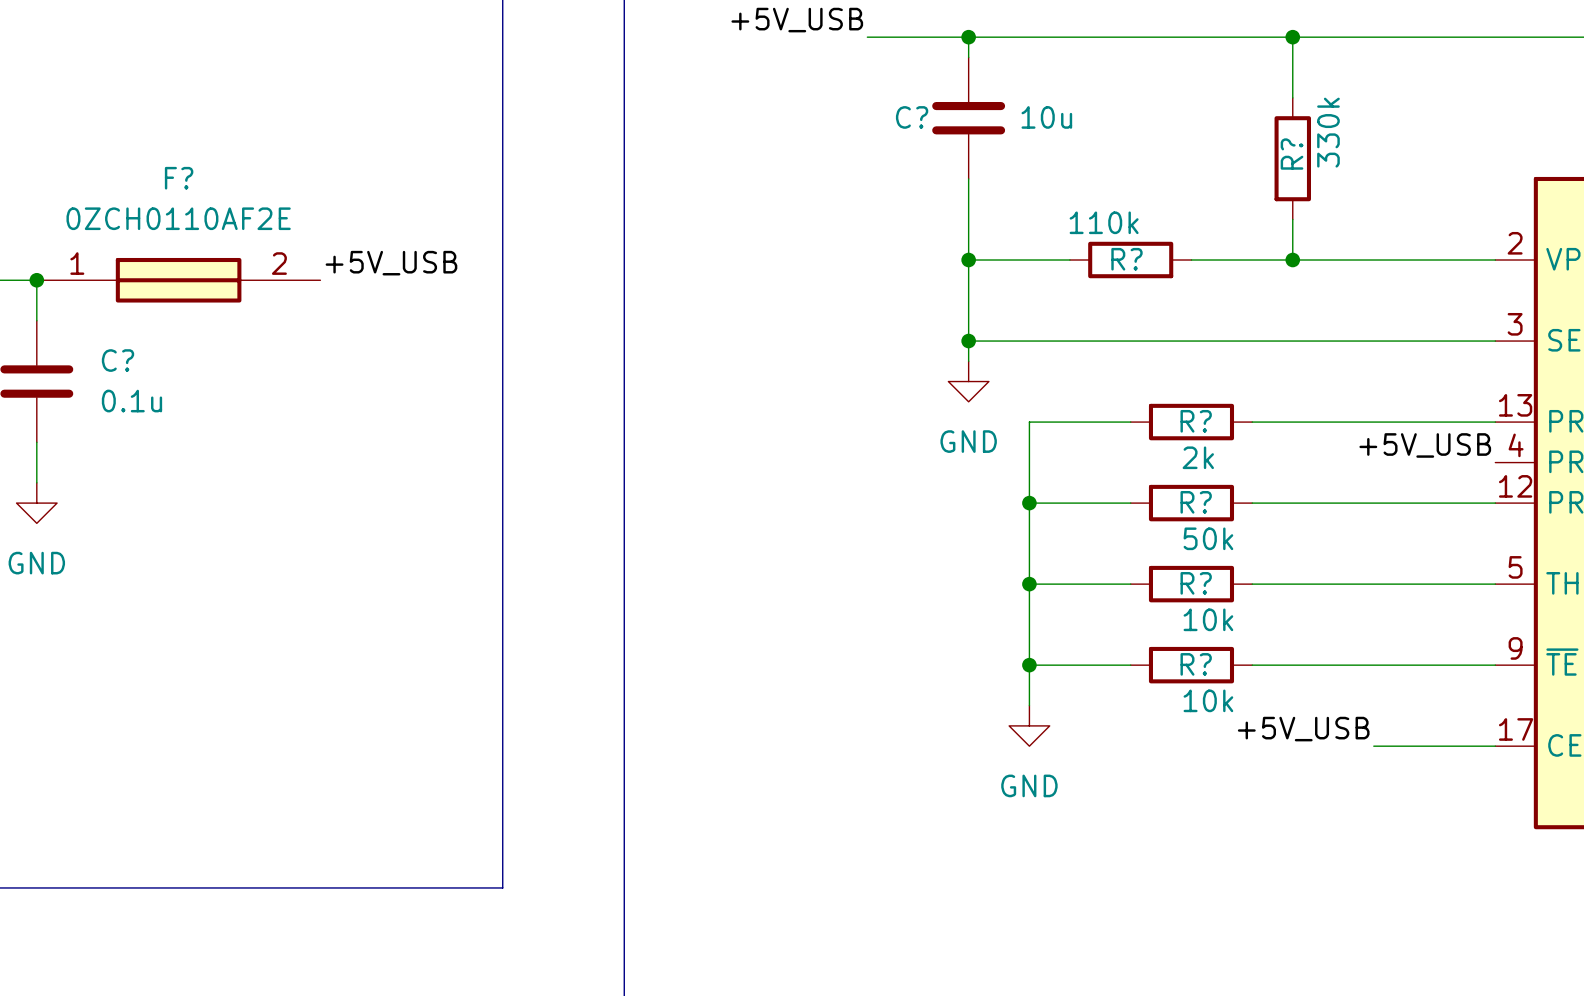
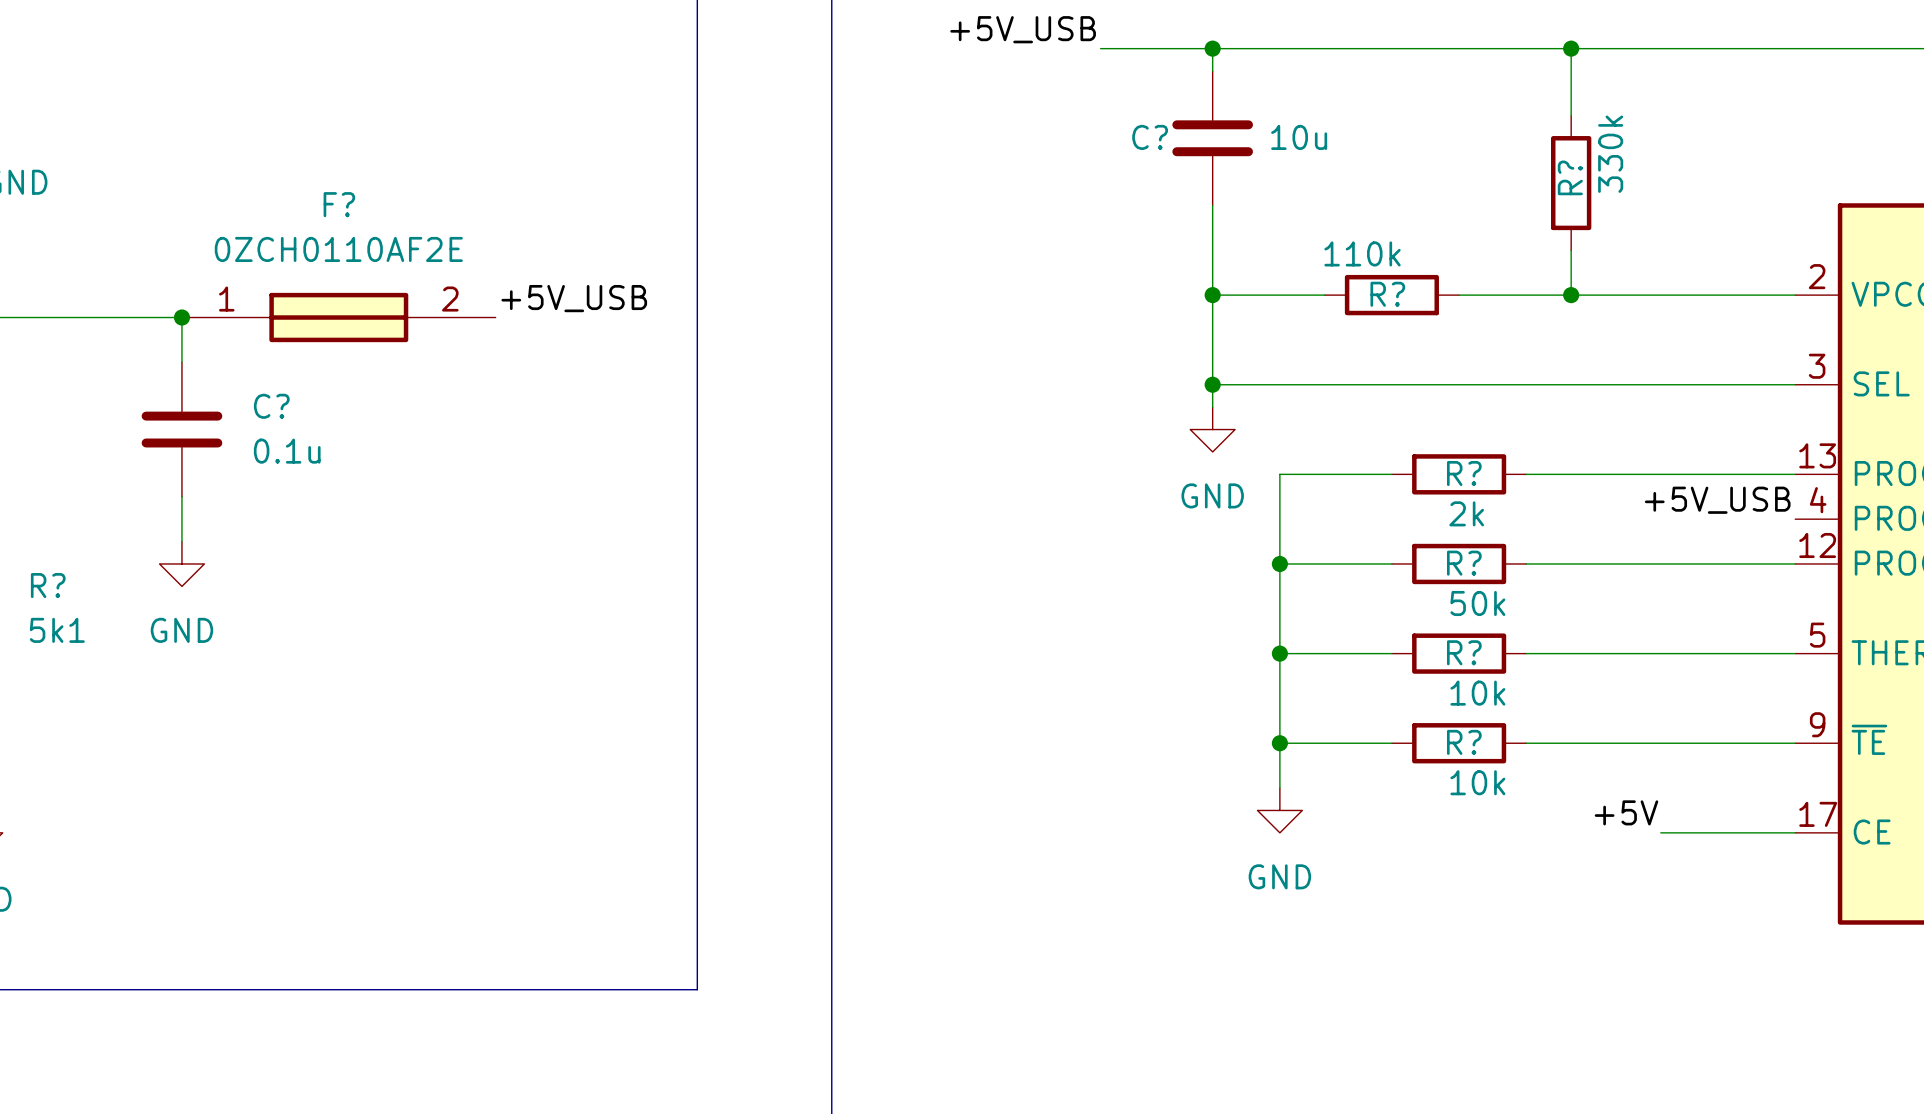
label: +5V_USB (1303, 729) -> +5V (1626, 812)

